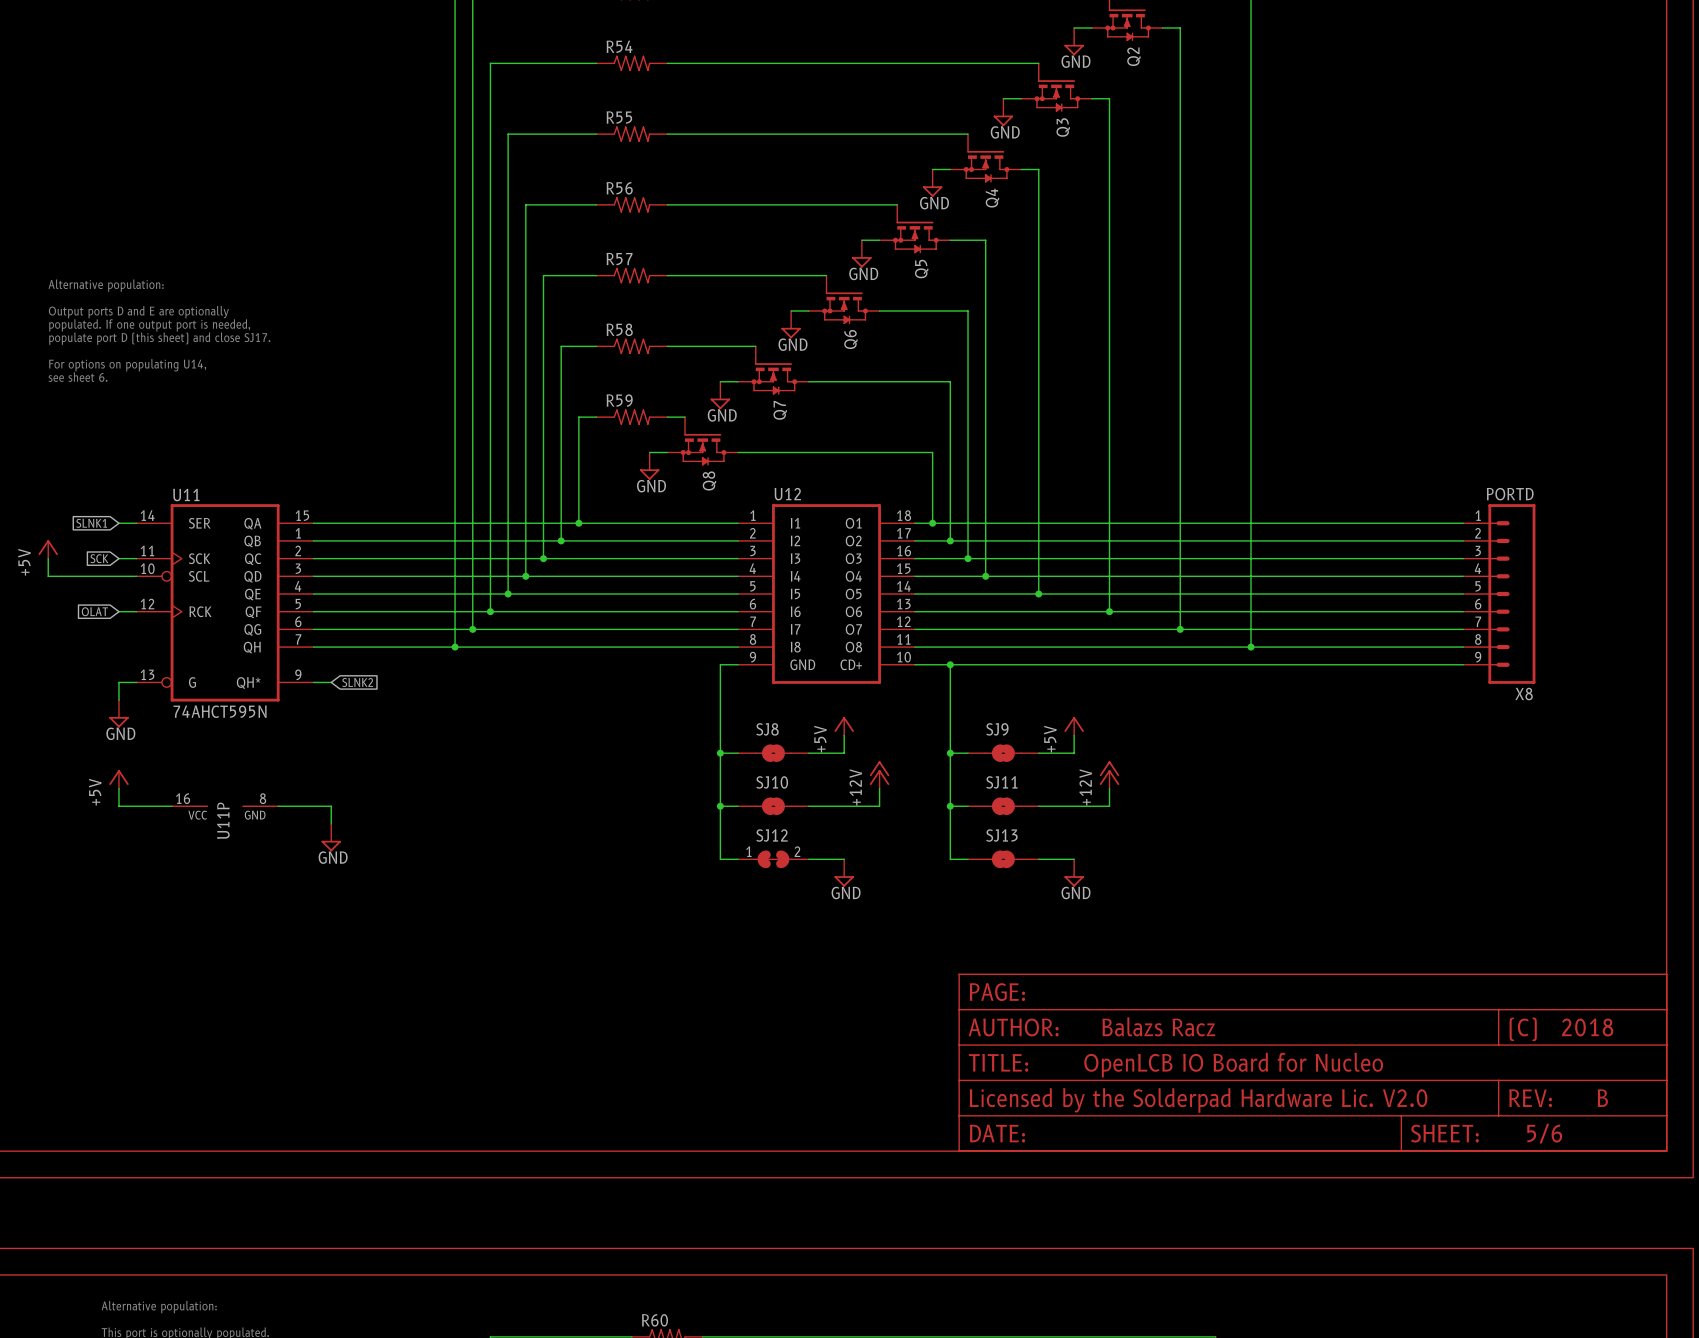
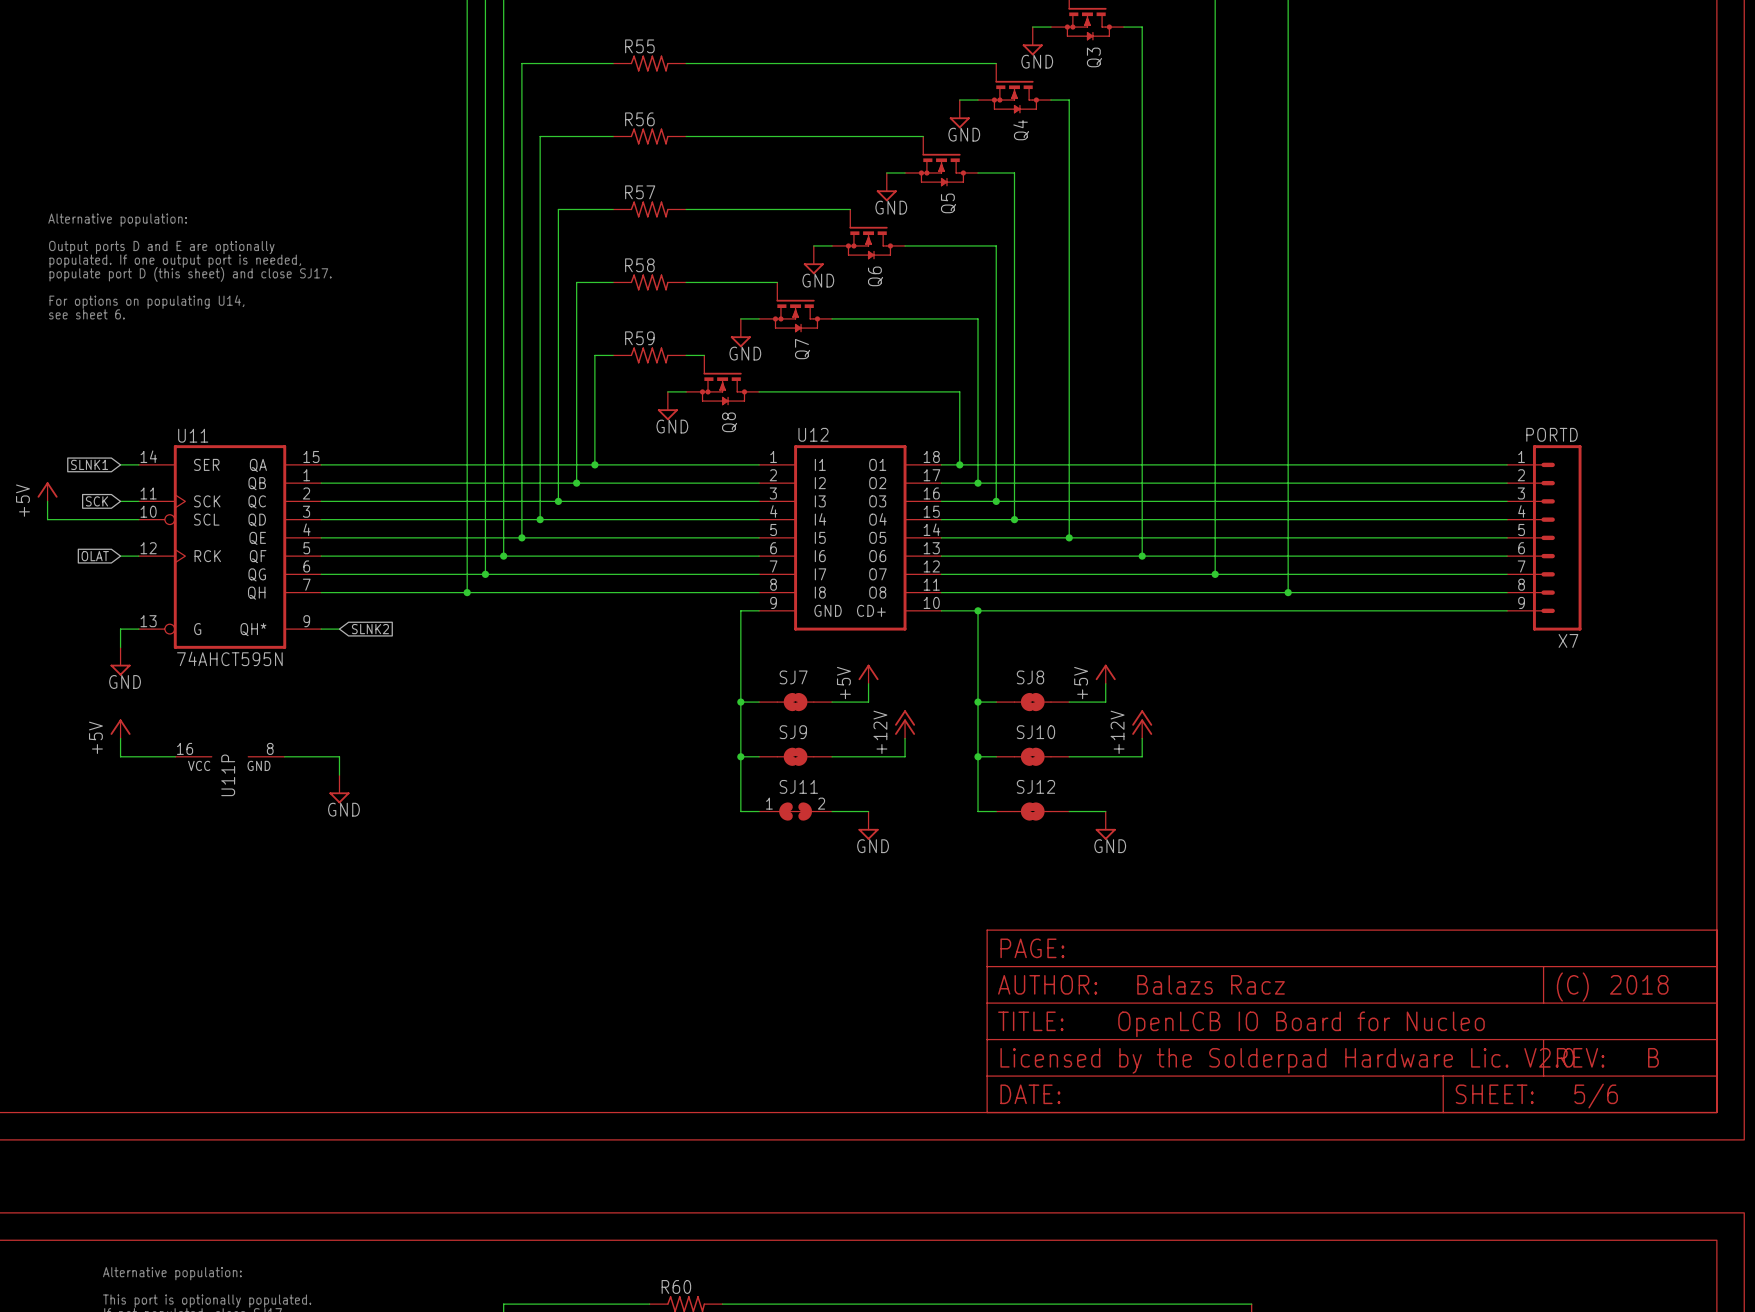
X8 name: X8 (1524, 694) -> X7 (1568, 640)
SJ8 name: SJ8 (767, 729) -> SJ7 (793, 677)
SJ9 name: SJ9 (997, 729) -> SJ8 (1030, 677)
SJ10 name: SJ10 (772, 782) -> SJ9 (793, 732)
SJ11 name: SJ11 (1001, 782) -> SJ10 (1035, 732)
SJ12 name: SJ12 (772, 835) -> SJ11 (798, 786)
SJ13 name: SJ13 (1001, 835) -> SJ12 (1035, 786)

